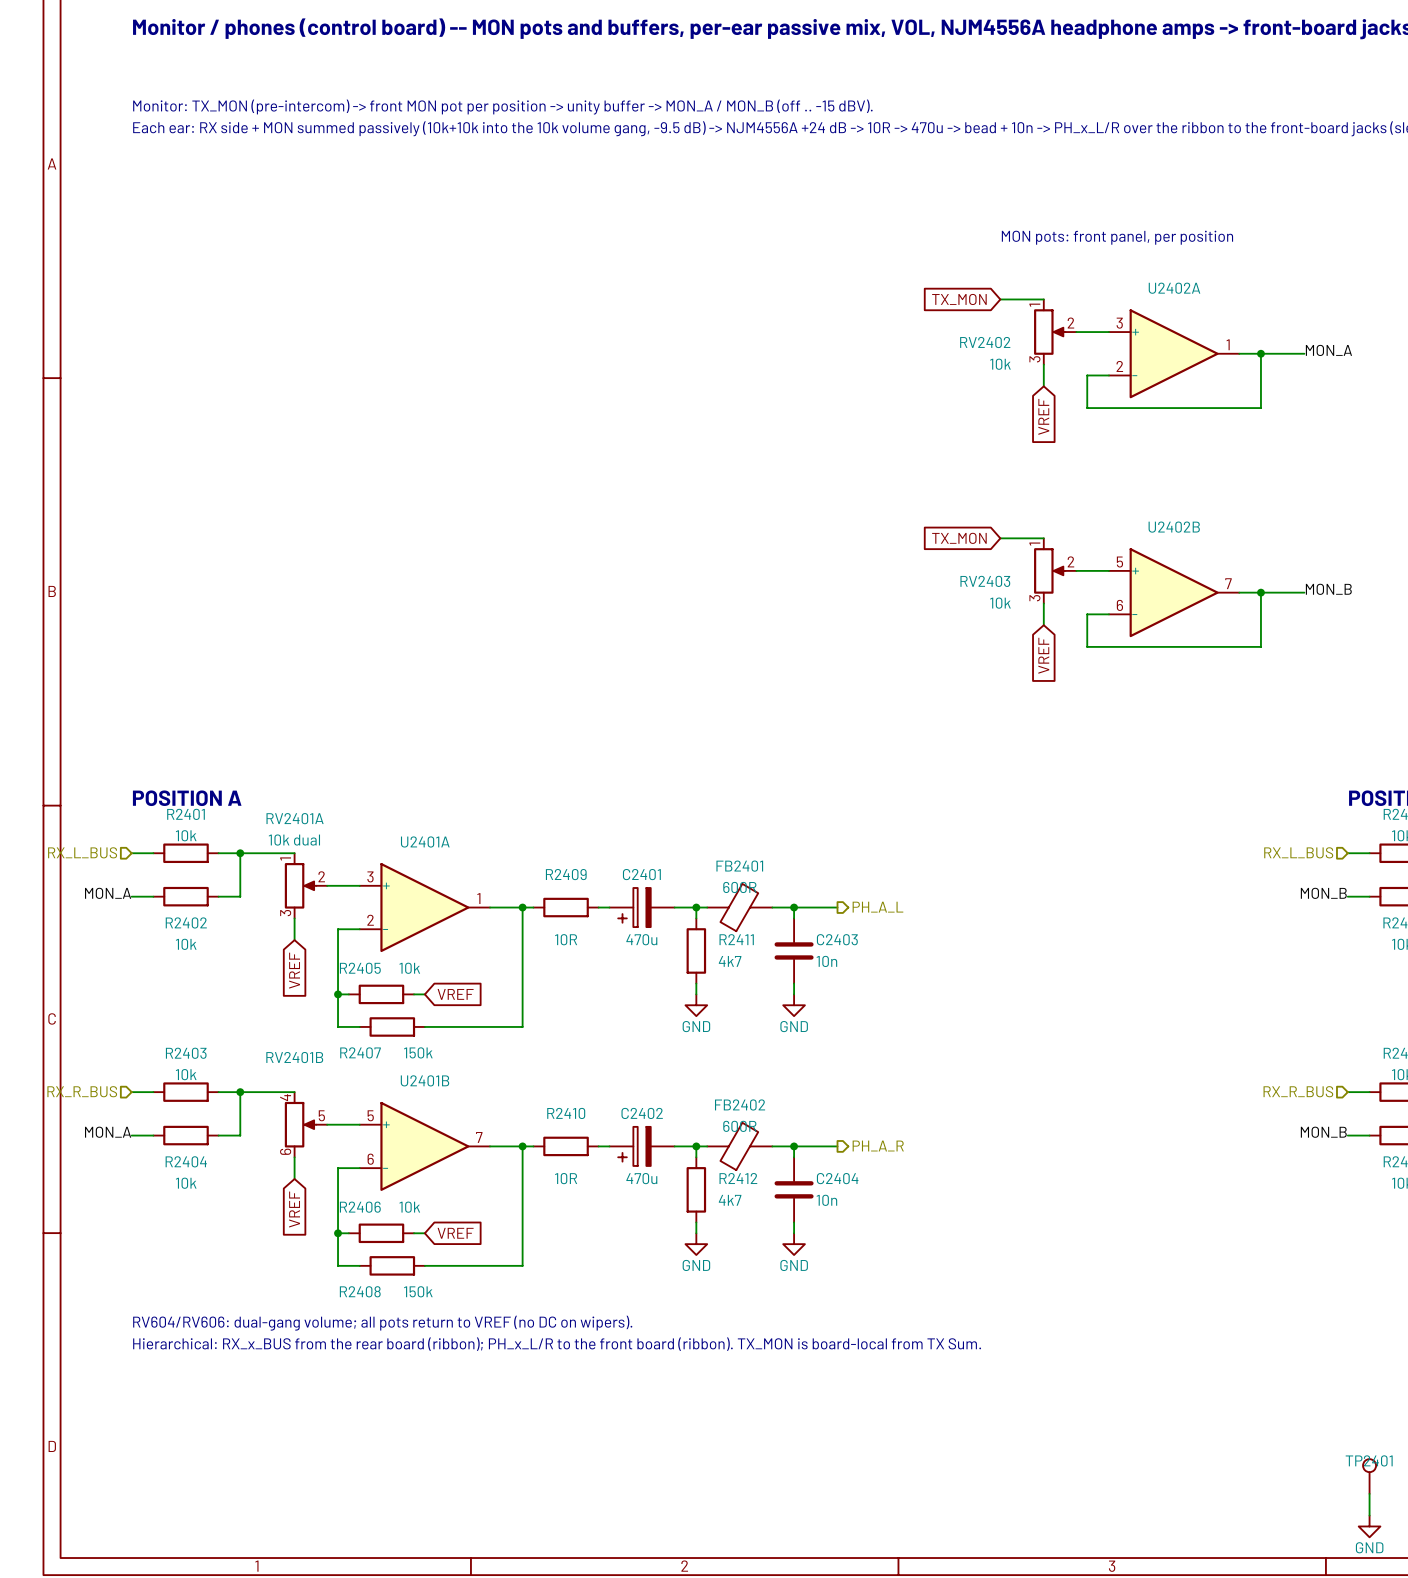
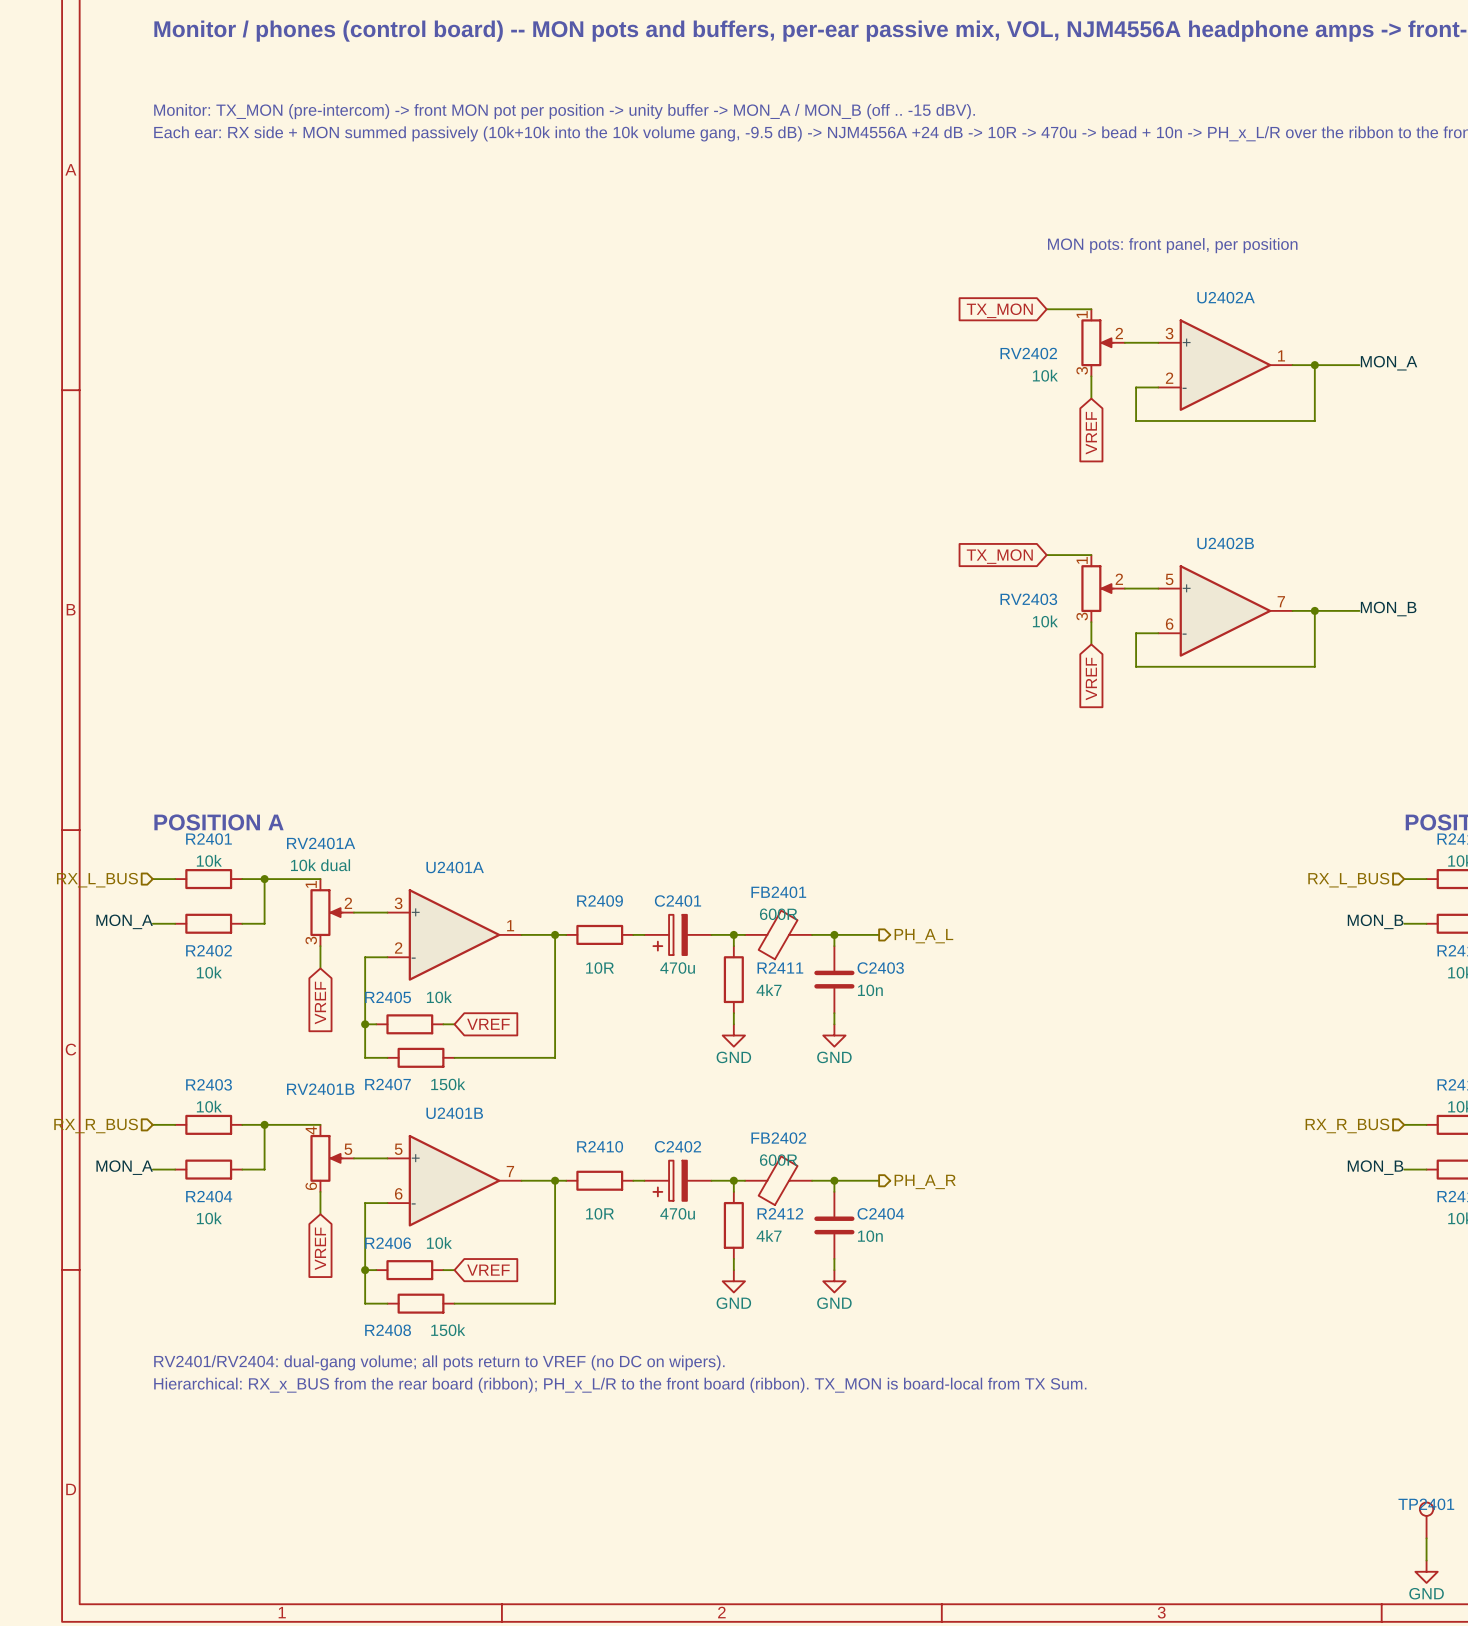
text: RV604/RV606: dual-gang volume; all pots return to VREF (no DC on wipers). (382, 1323) -> RV2401/RV2404: dual-gang volume; all pots return to VREF (no DC on wipers). (439, 1362)

